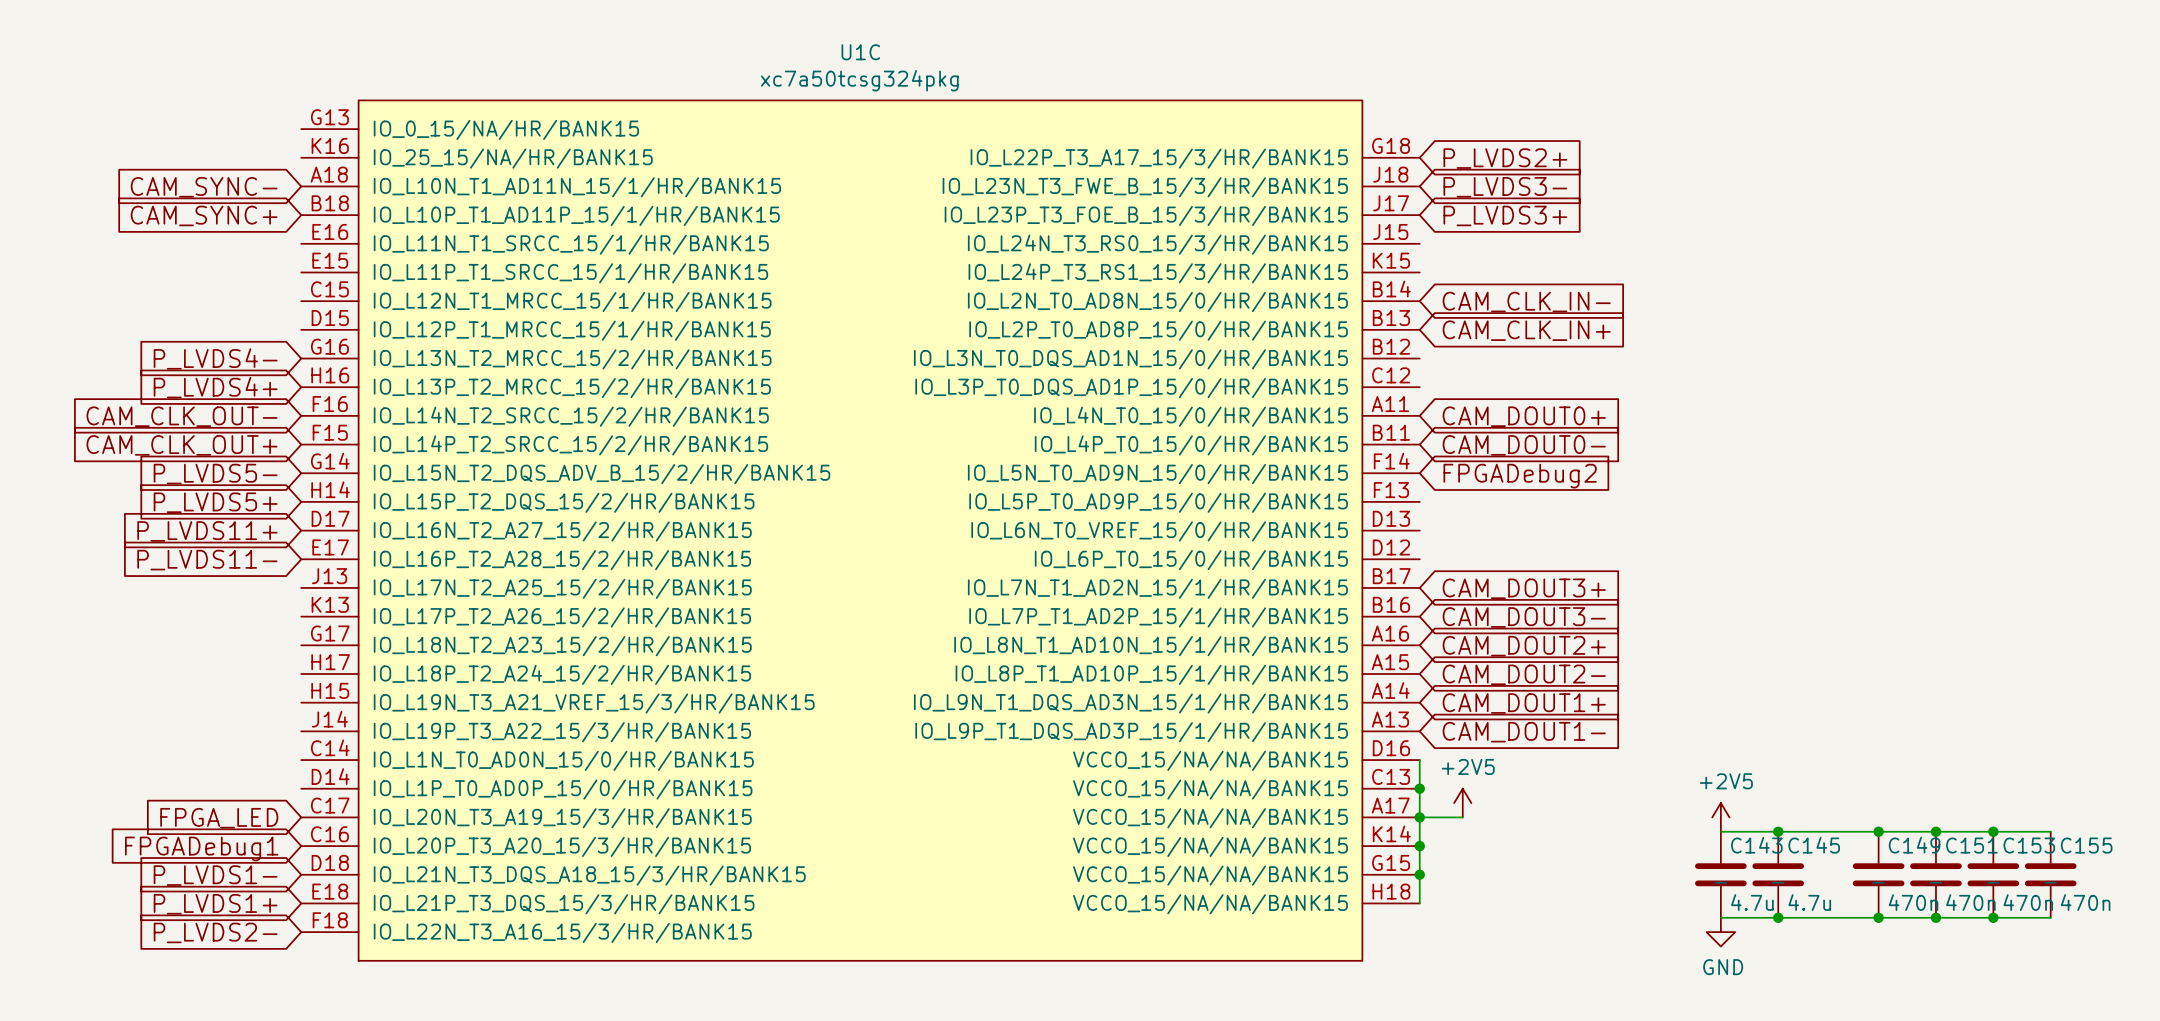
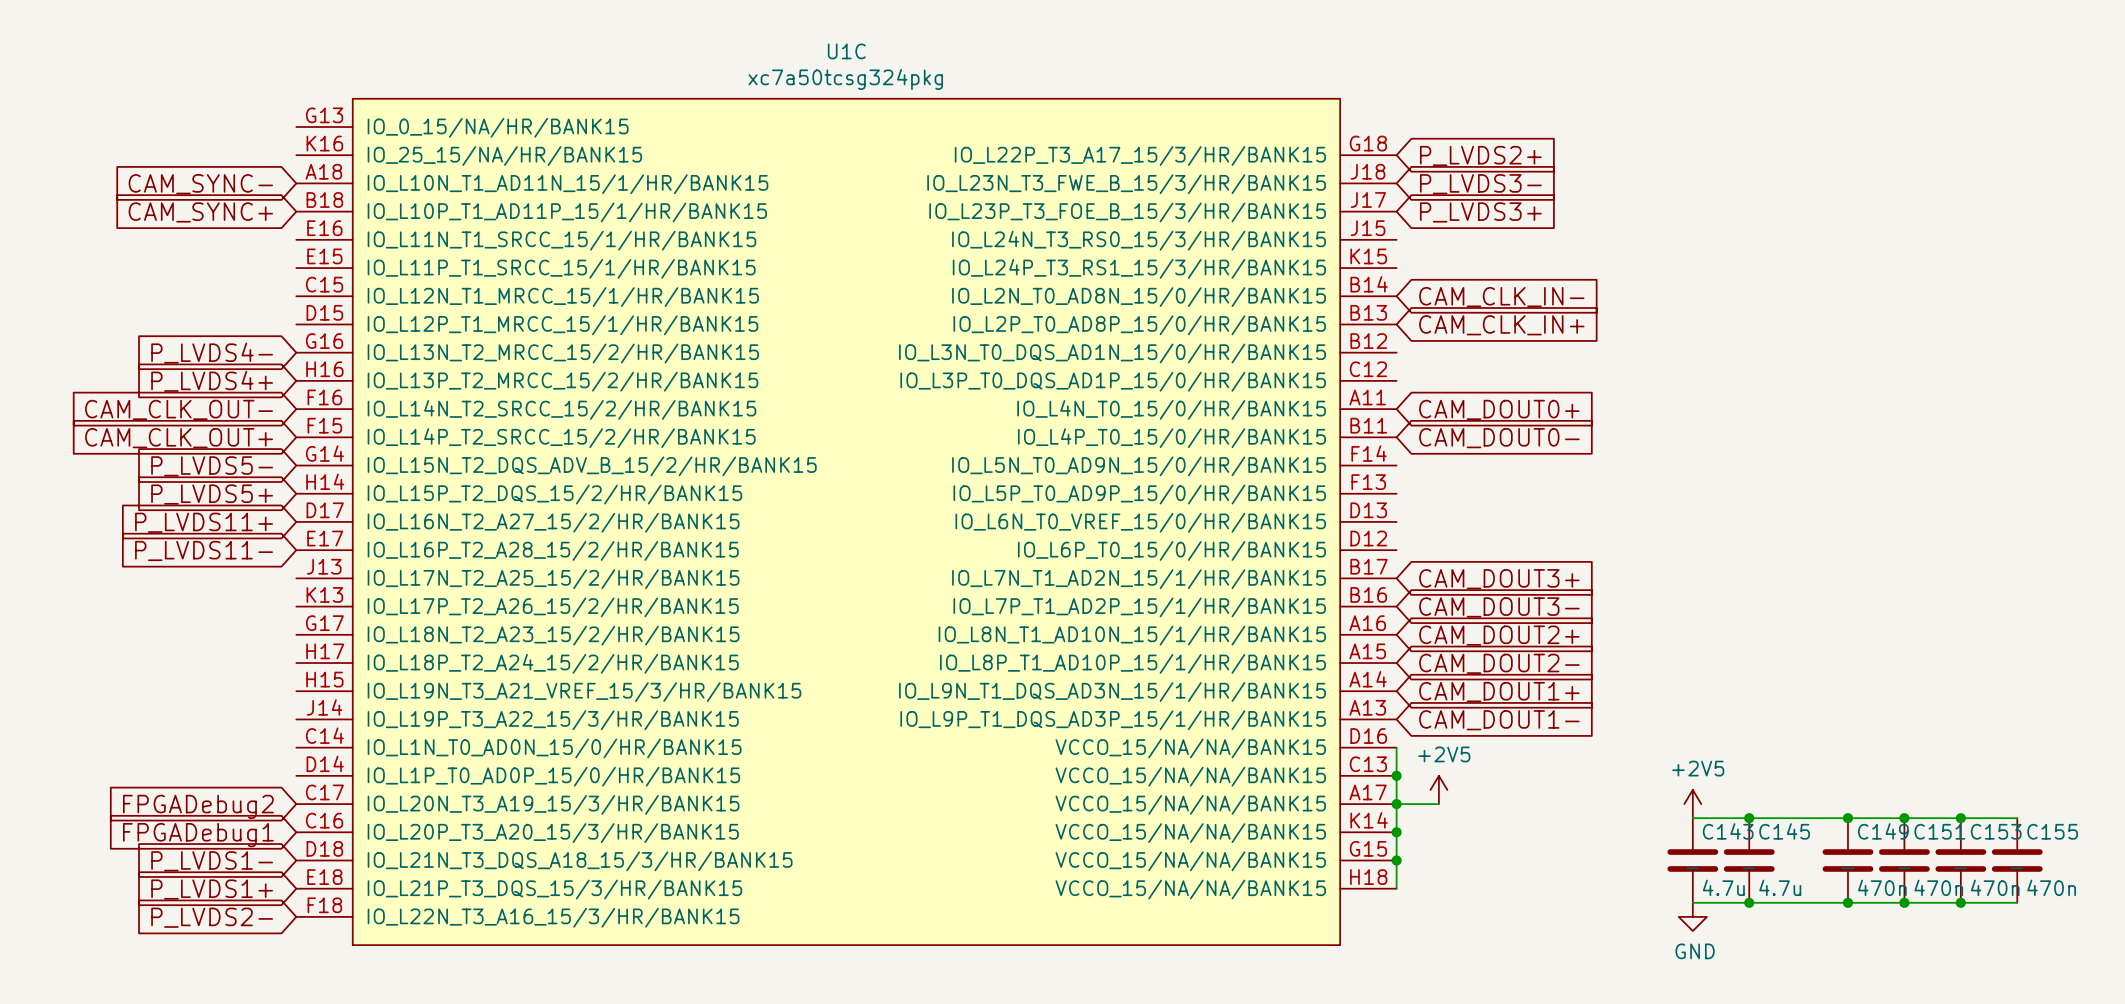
global label: FPGADebug2 (1520, 476) -> none
global label: FPGA_LED (219, 818) -> FPGADebug2 (198, 806)

